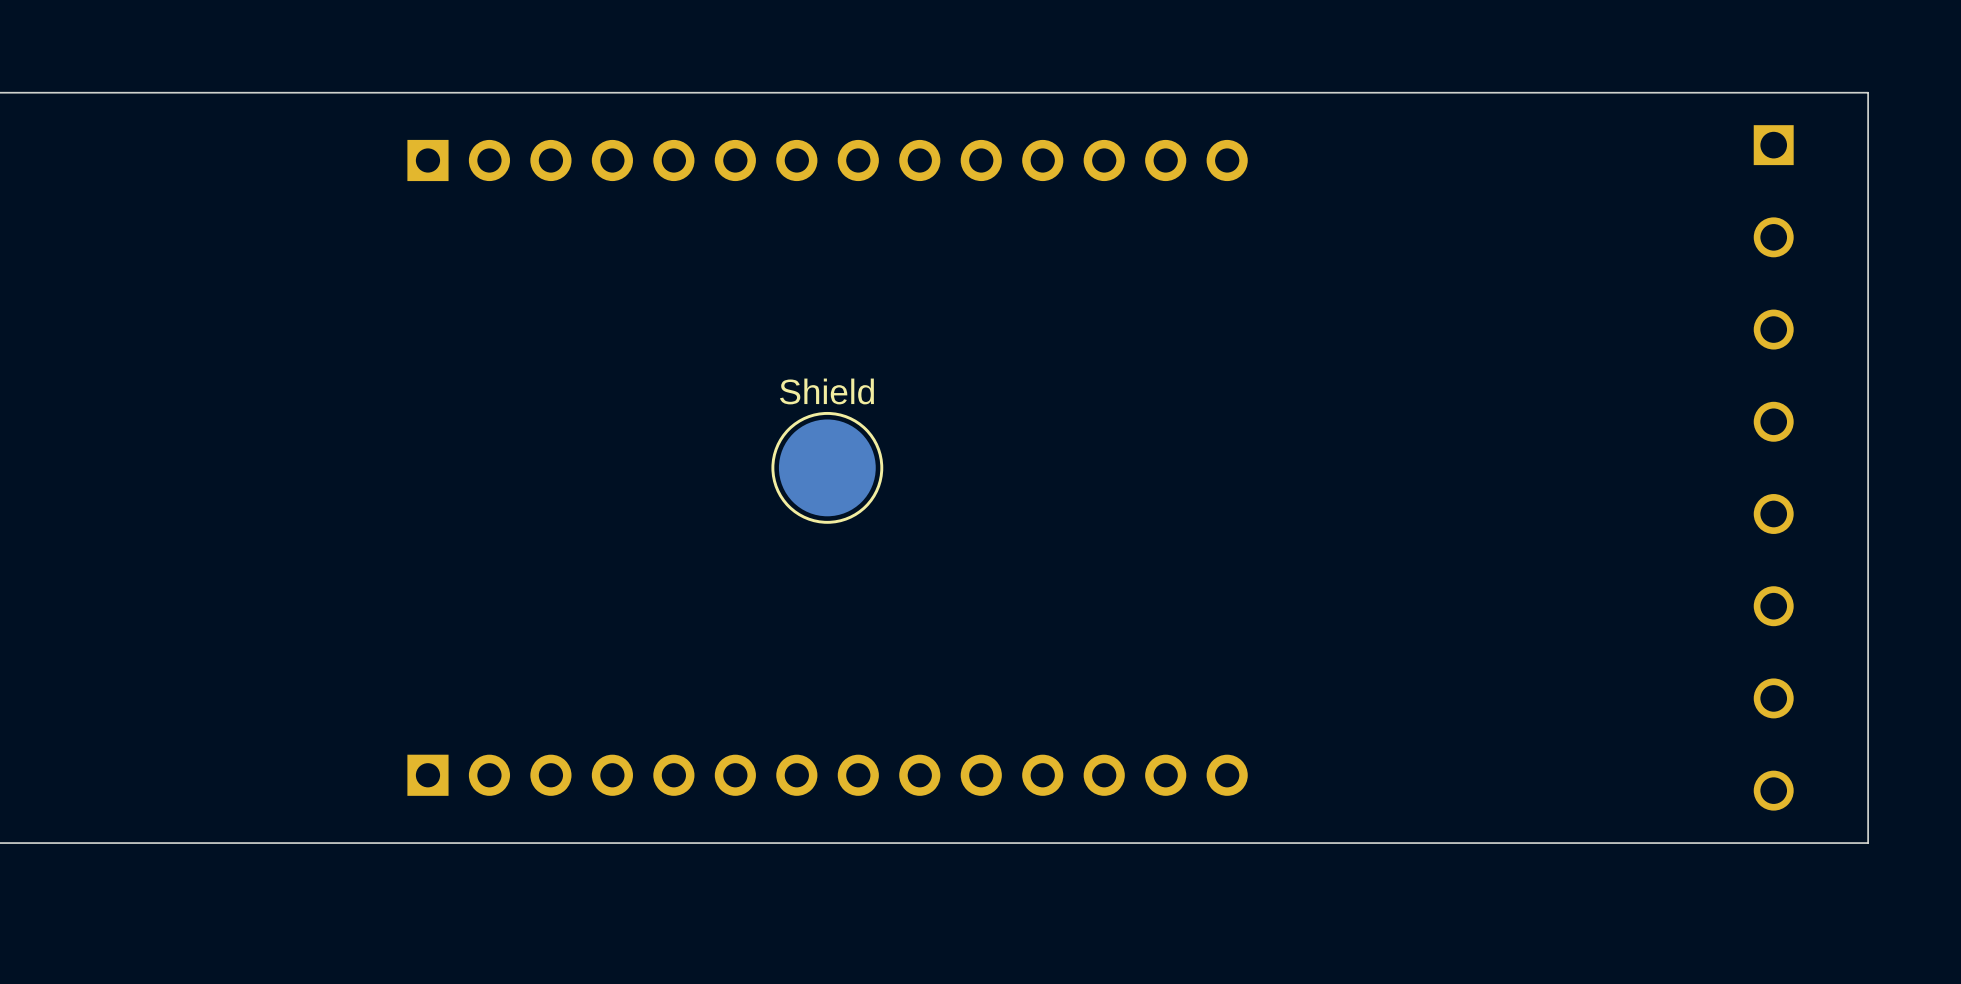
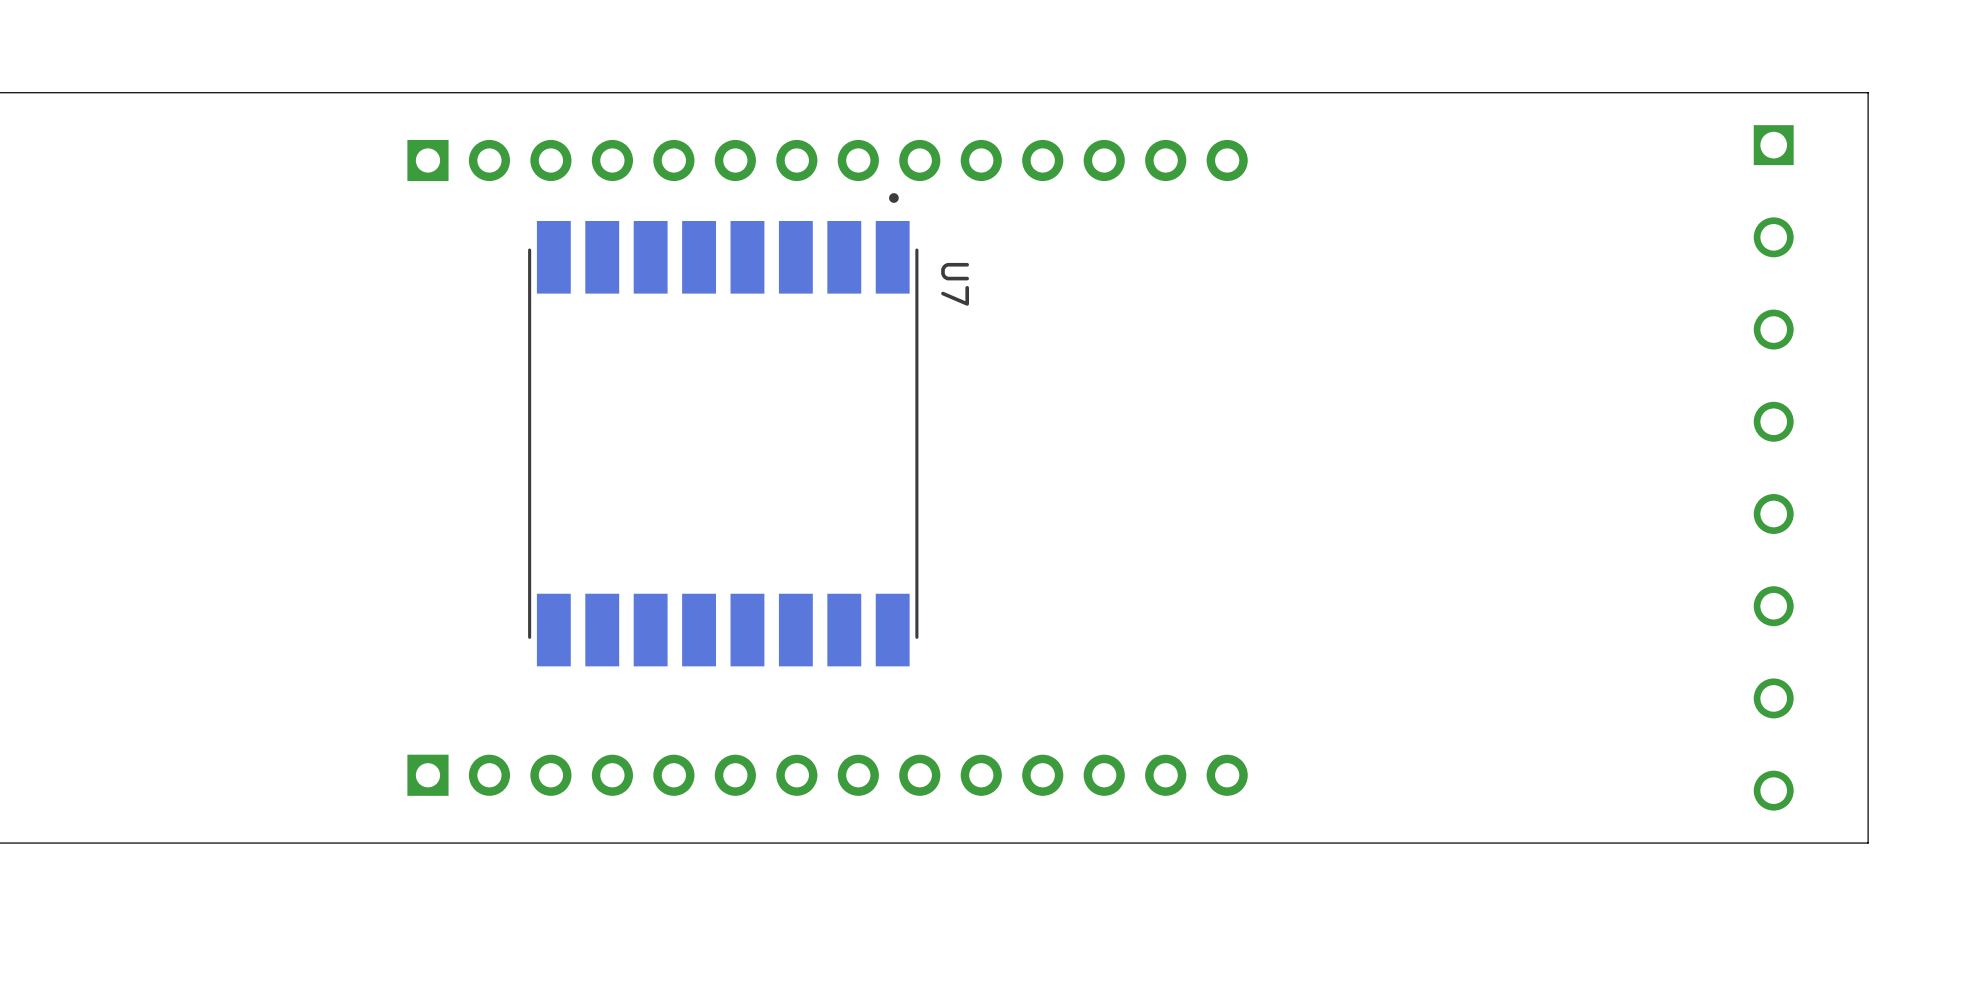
U7: none -> (723, 429)
part: Shield (827, 467) -> none

